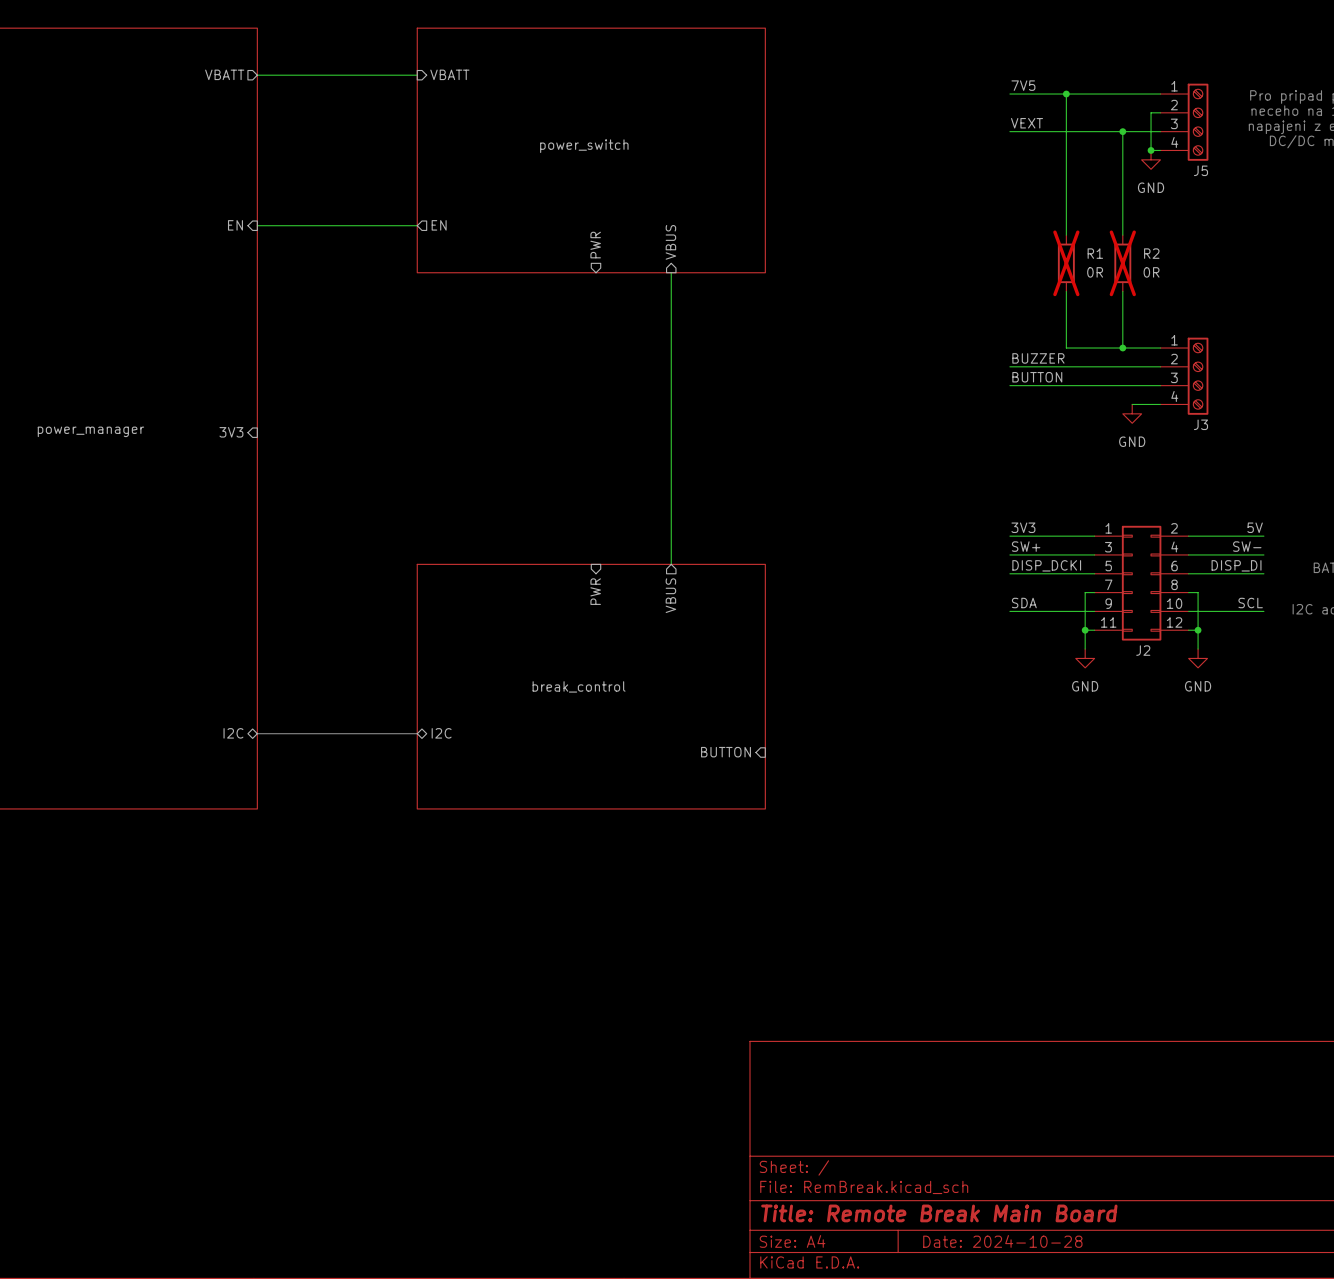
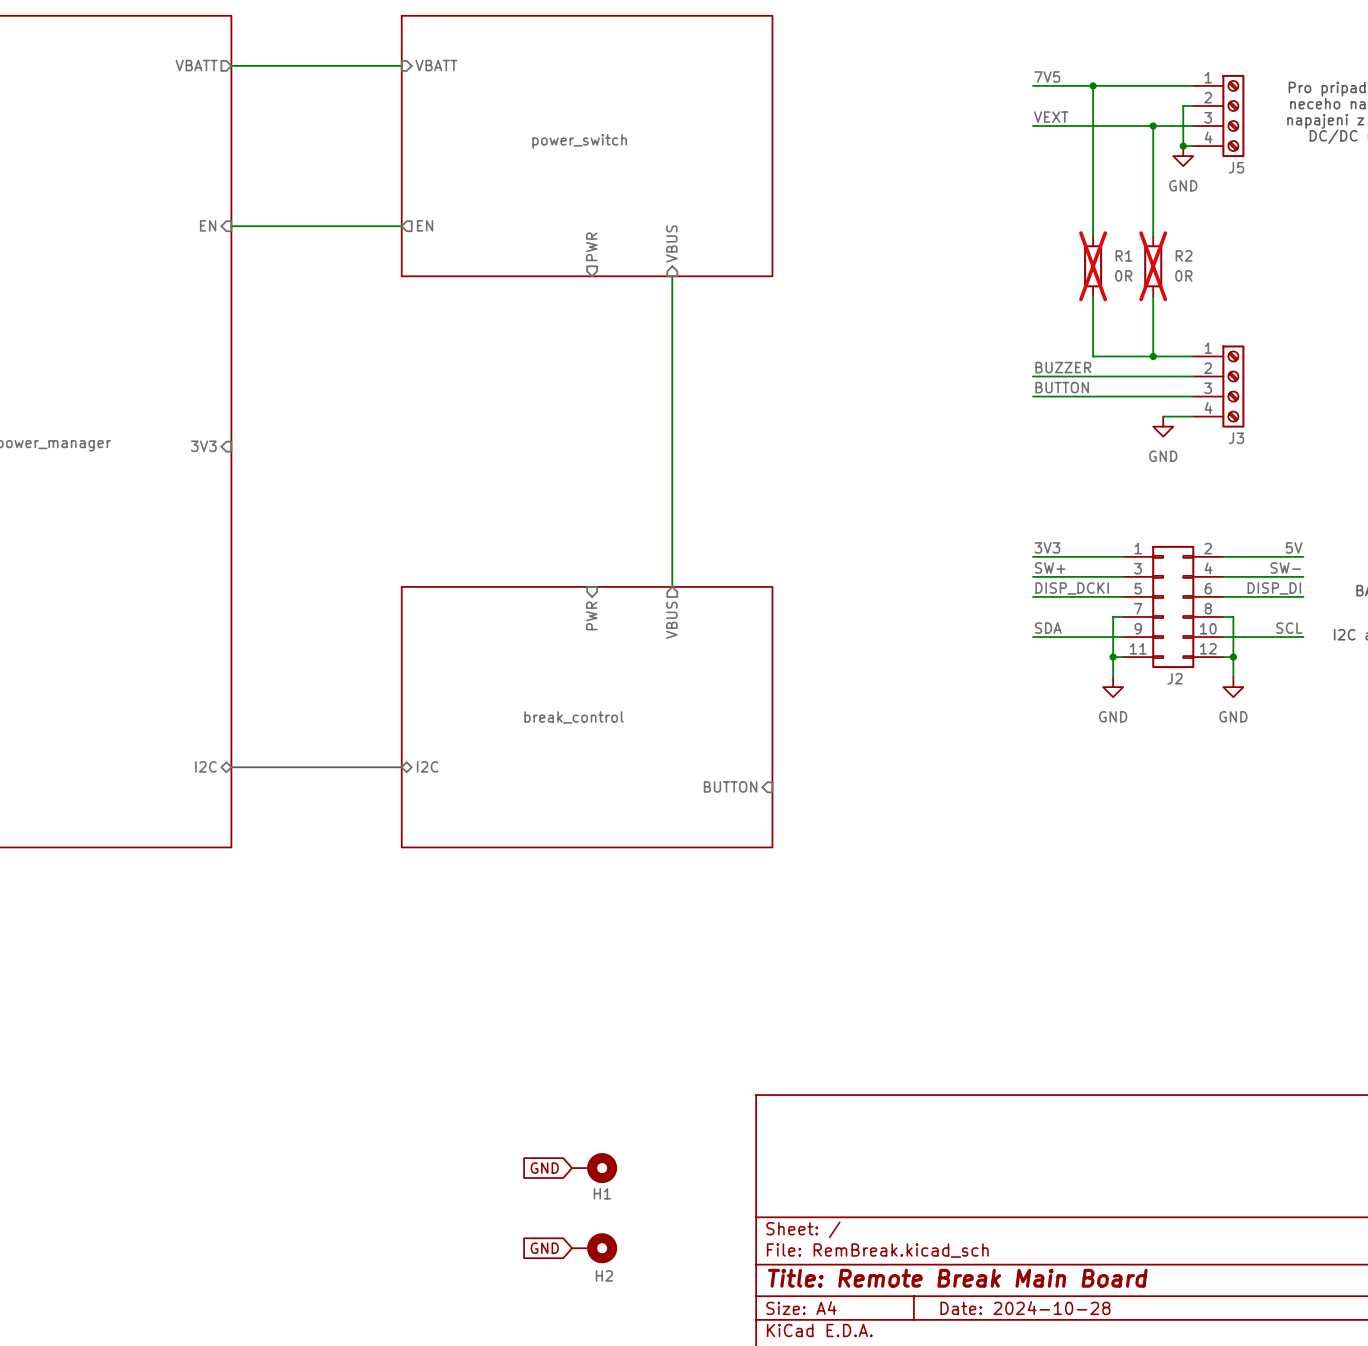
global label: none -> GND (544, 1168)
H1: none -> (594, 1168)
global label: none -> GND (544, 1248)
H2: none -> (594, 1248)

